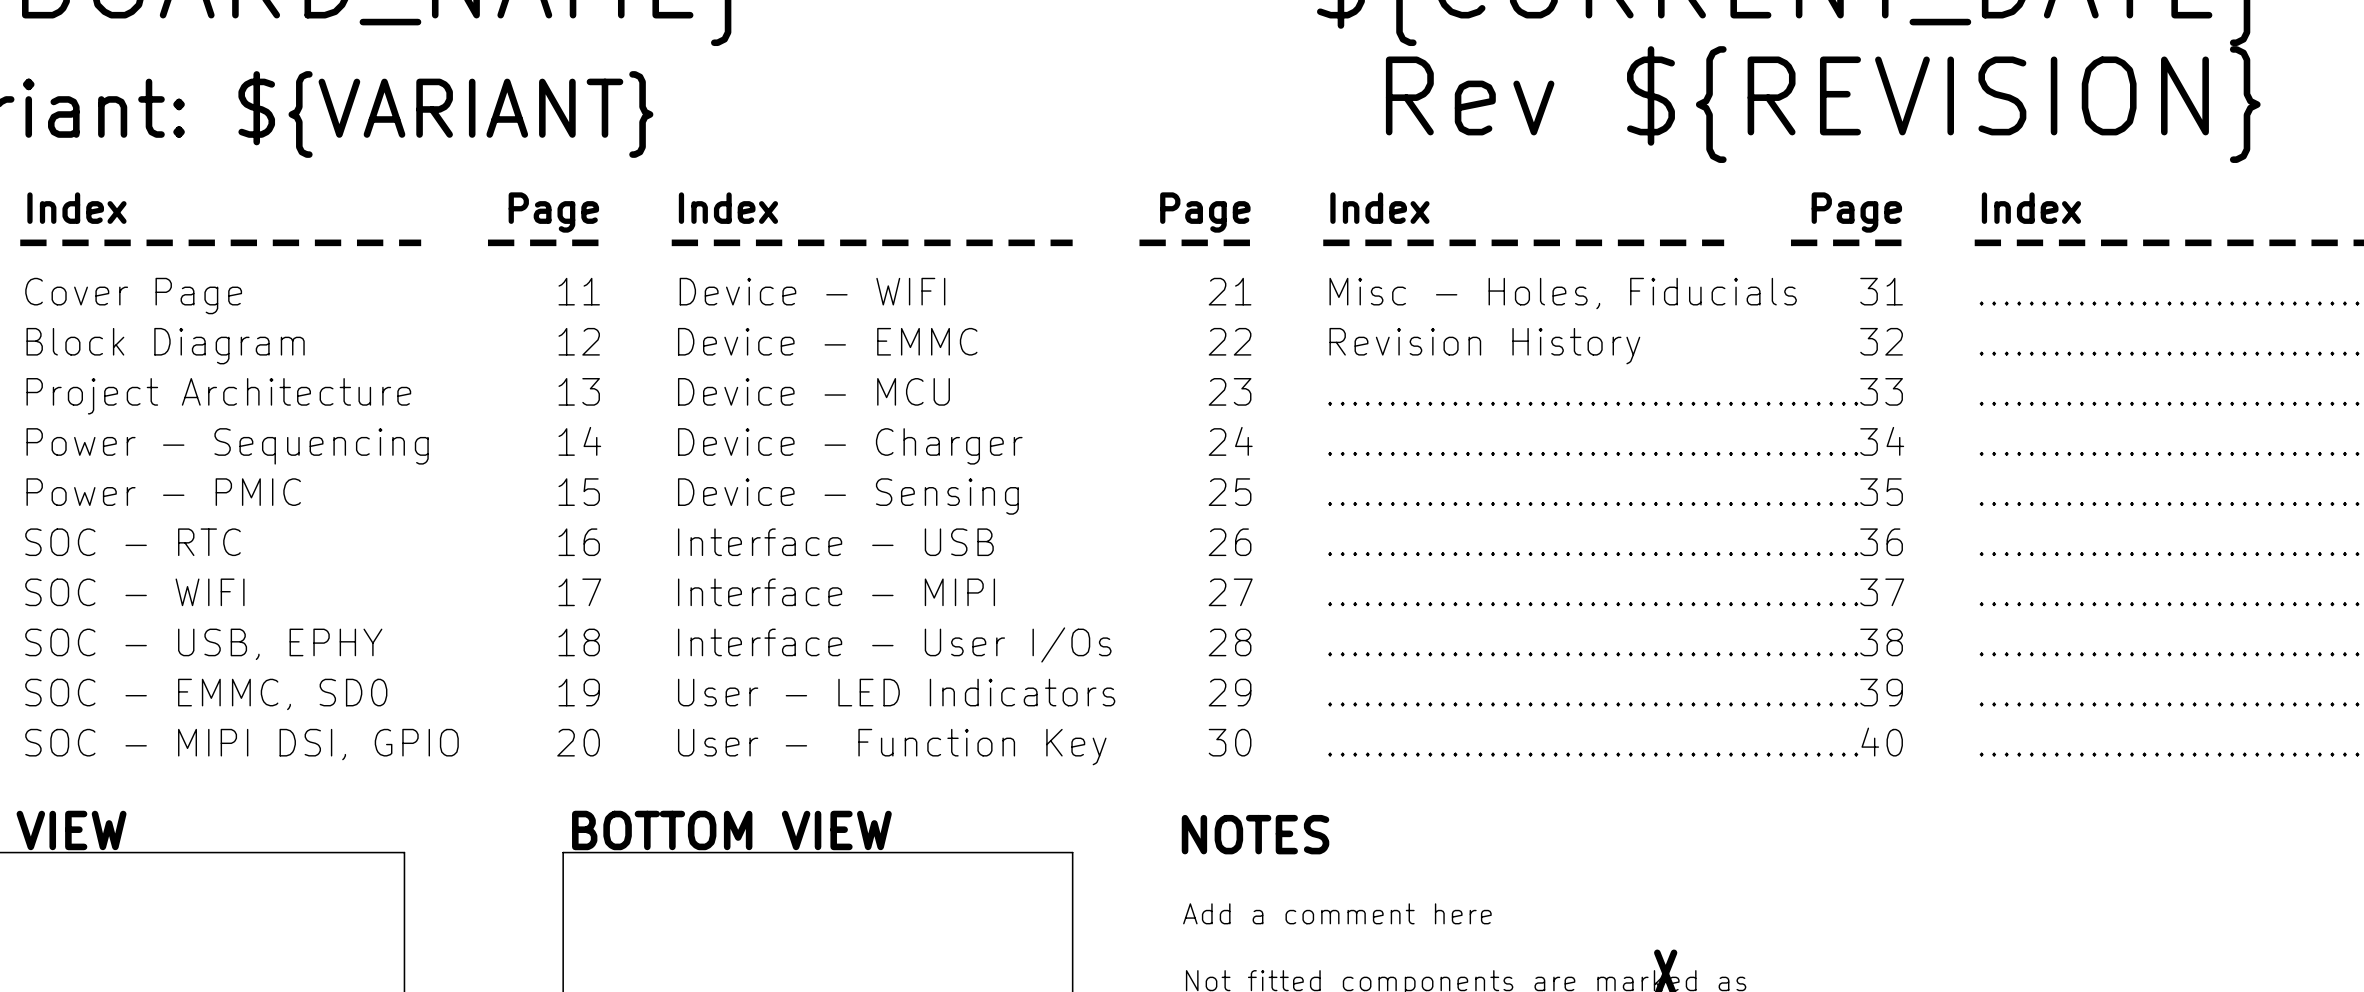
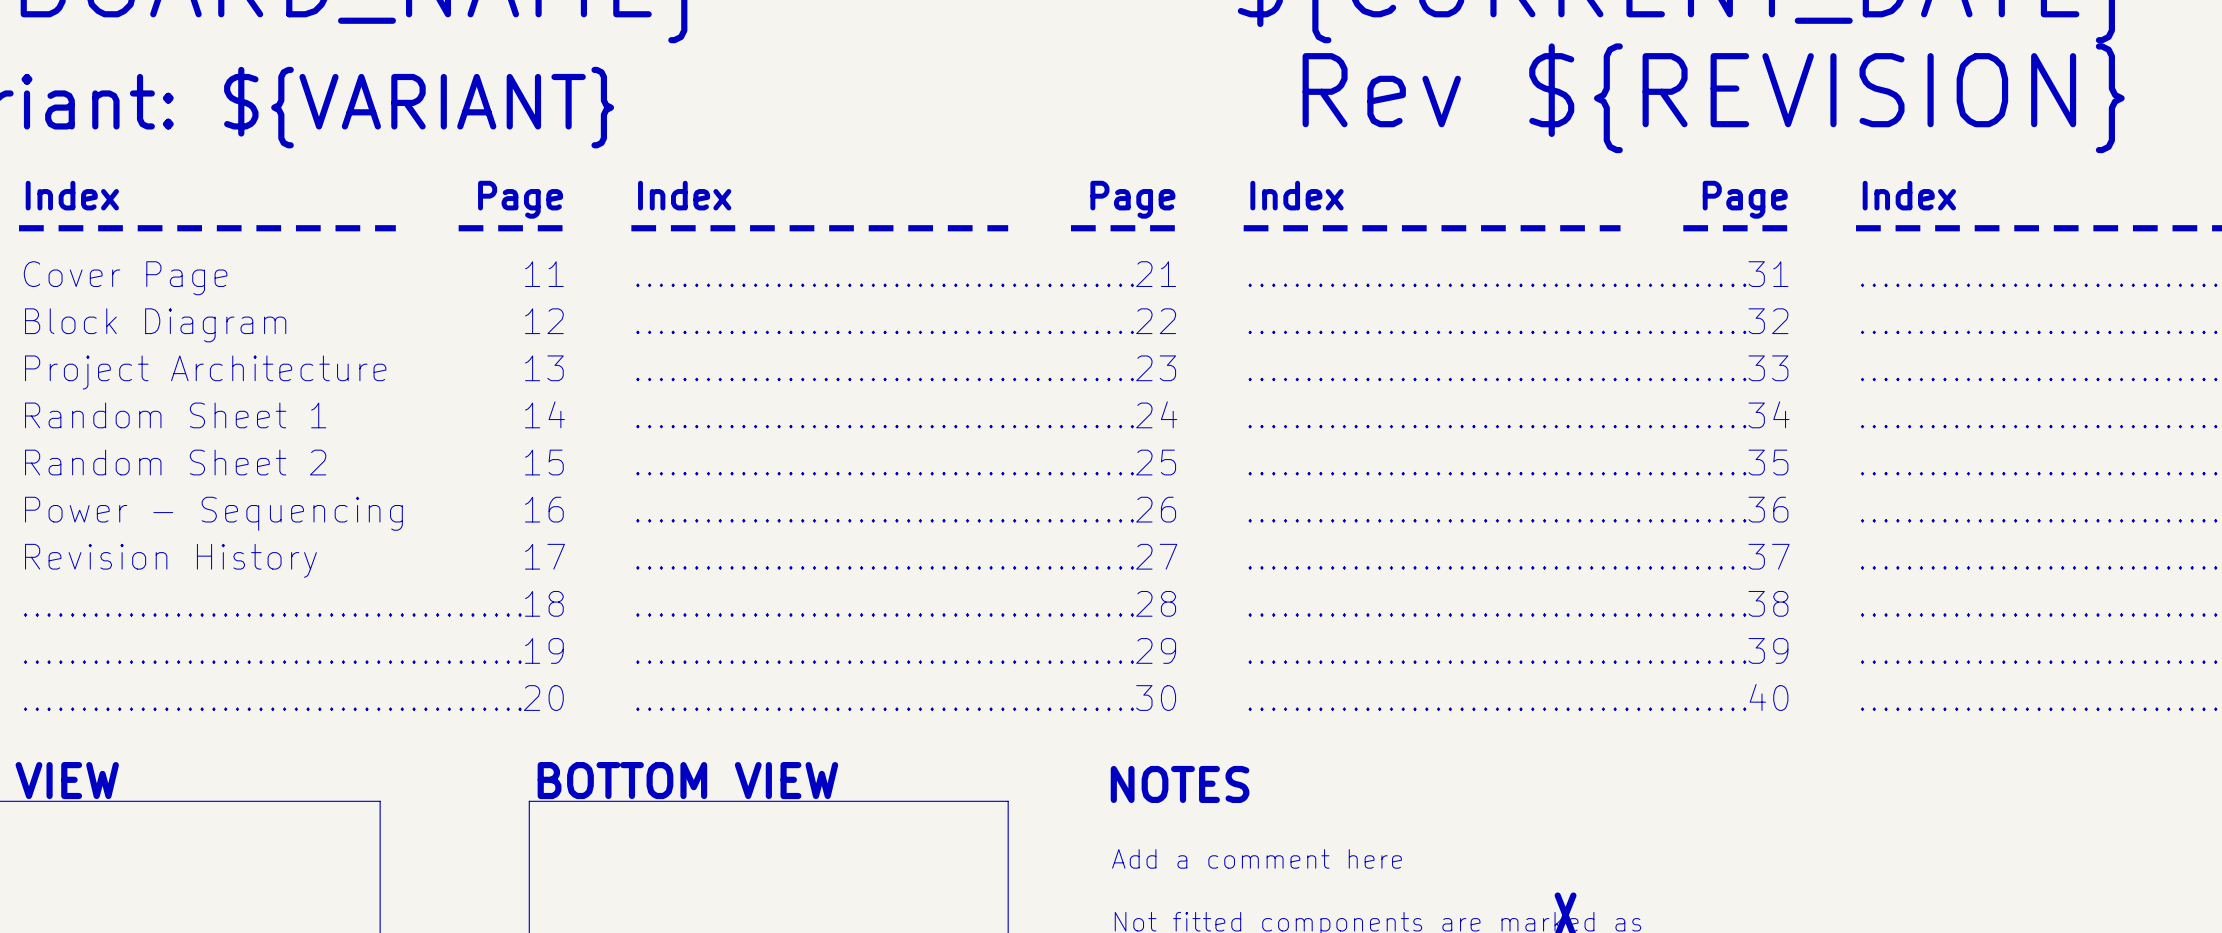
text: Device - WIFI (812, 291) -> ........................................... (885, 285)
text: Misc - Holes, Fiducials (1563, 293) -> ........................................... (1497, 285)
text: Device - EMMC (827, 341) -> ........................................... (885, 332)
text: Revision History (1484, 346) -> ........................................... (1497, 332)
text: Device - MCU (813, 391) -> ........................................... (885, 379)
text: Power - Sequencing (227, 446) -> Random Sheet 1 (175, 415)
text: Device - Charger (850, 446) -> ........................................... (885, 426)
text: Power - PMIC (163, 492) -> Random Sheet 2 (175, 462)
text: Device - Sensing (848, 496) -> ........................................... (885, 473)
text: SOC - RTC (133, 542) -> Power - Sequencing (213, 513)
text: Interface - USB (835, 542) -> ........................................... (885, 520)
text: SOC - WIFI (134, 592) -> Revision History (170, 560)
text: Interface - MIPI (836, 592) -> ........................................... (885, 567)
text: SOC - USB, EPHY (203, 644) -> ........................................... (272, 615)
text: Interface - User I/Os (894, 644) -> ........................................... (885, 615)
text: User - LED Indicators (896, 692) -> ........................................... (885, 662)
text: SOC - EMMC, SD0 (206, 694) -> ........................................... (272, 662)
text: SOC - MIPI DSI, GPIO (242, 744) -> ........................................... (272, 709)
text: User - Function Key (892, 747) -> ........................................... (885, 709)

